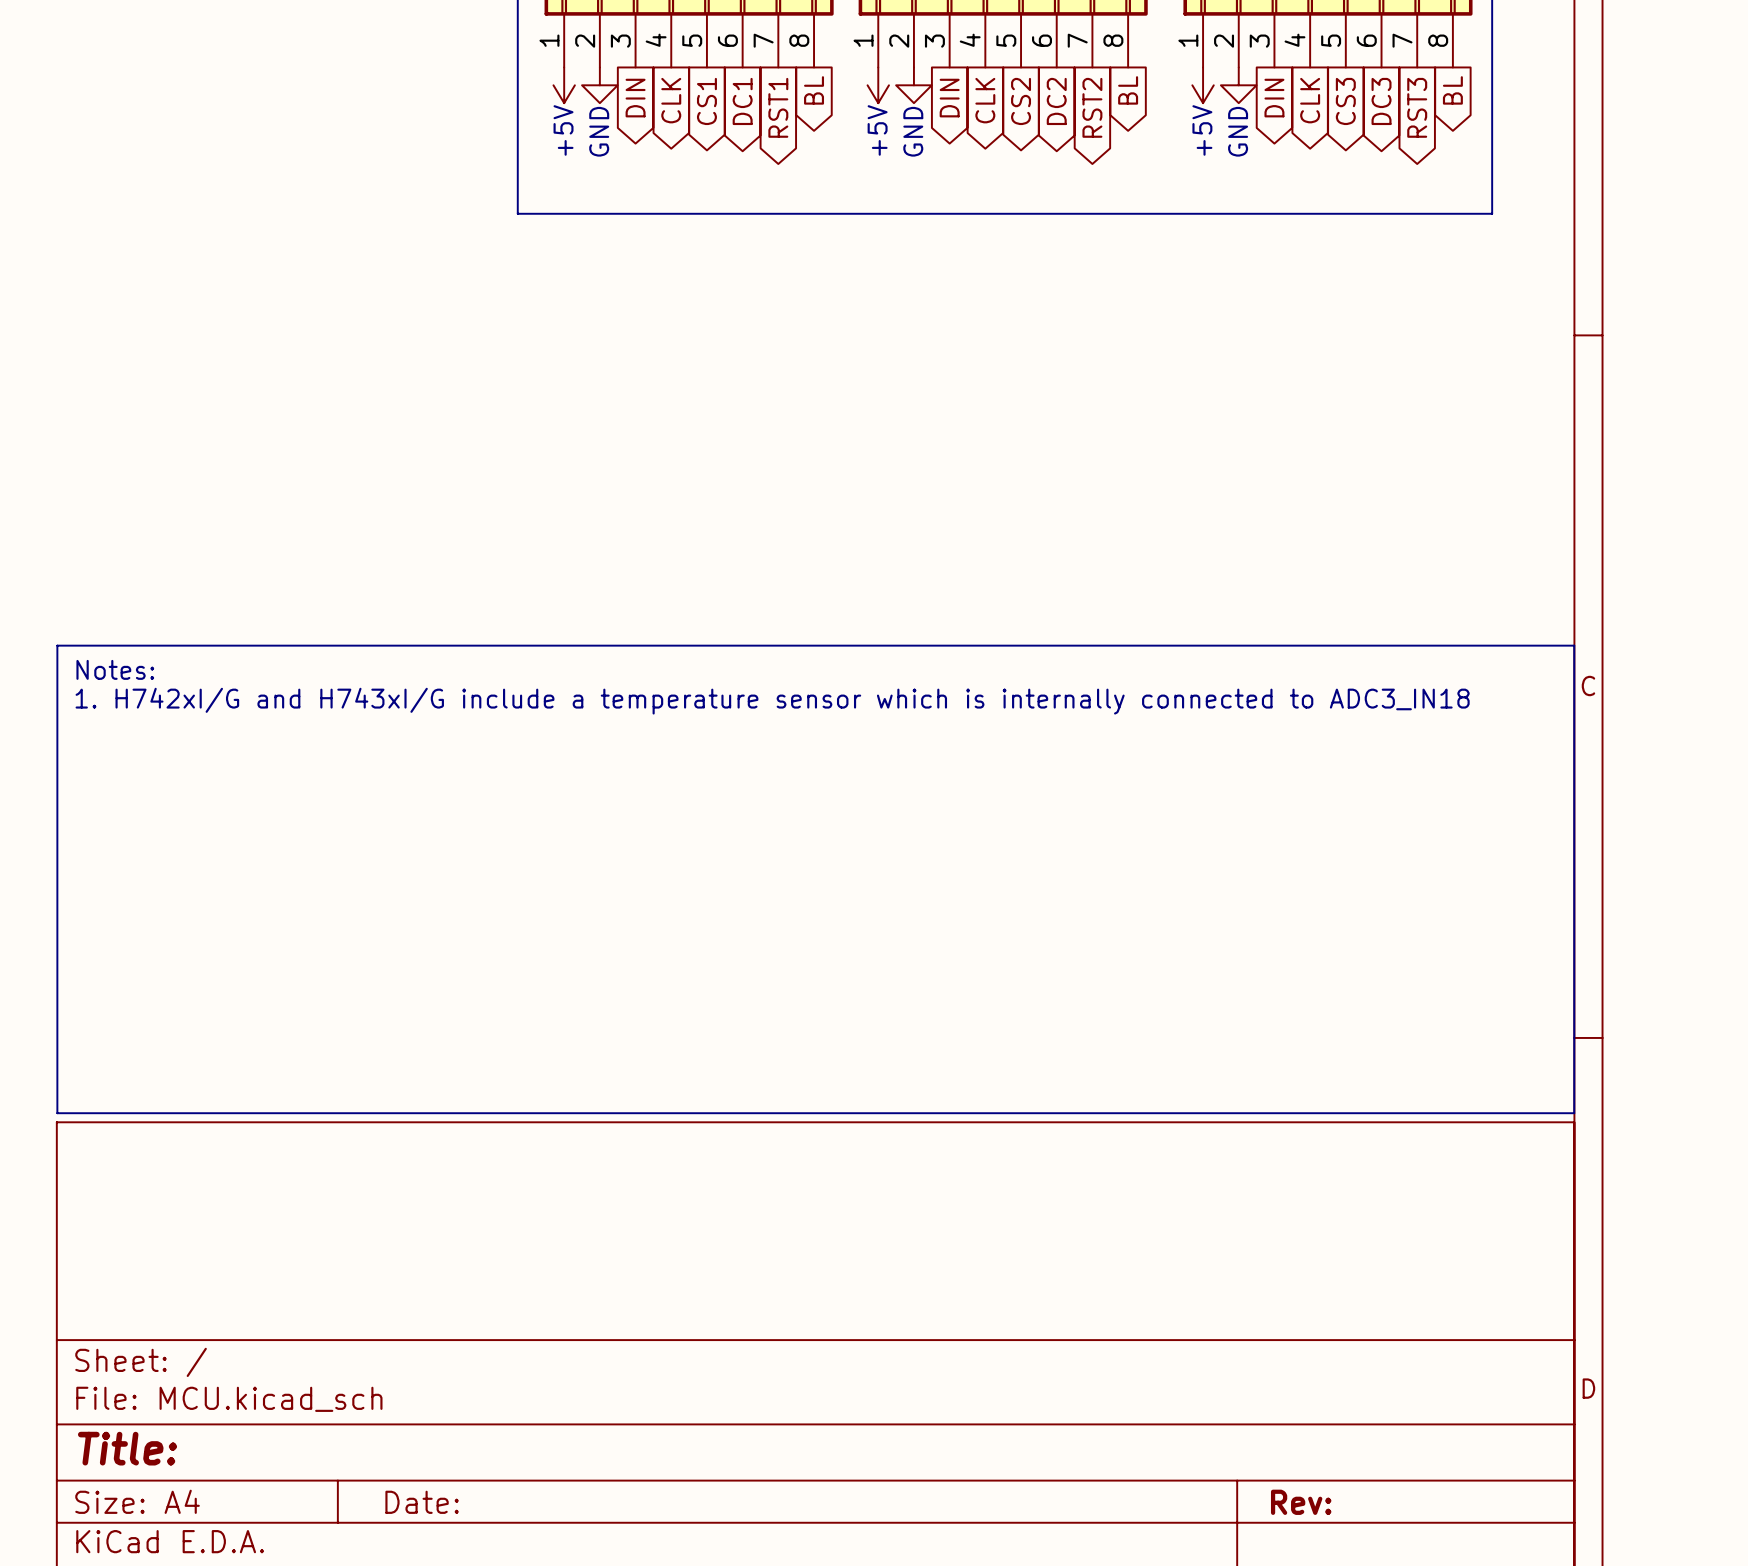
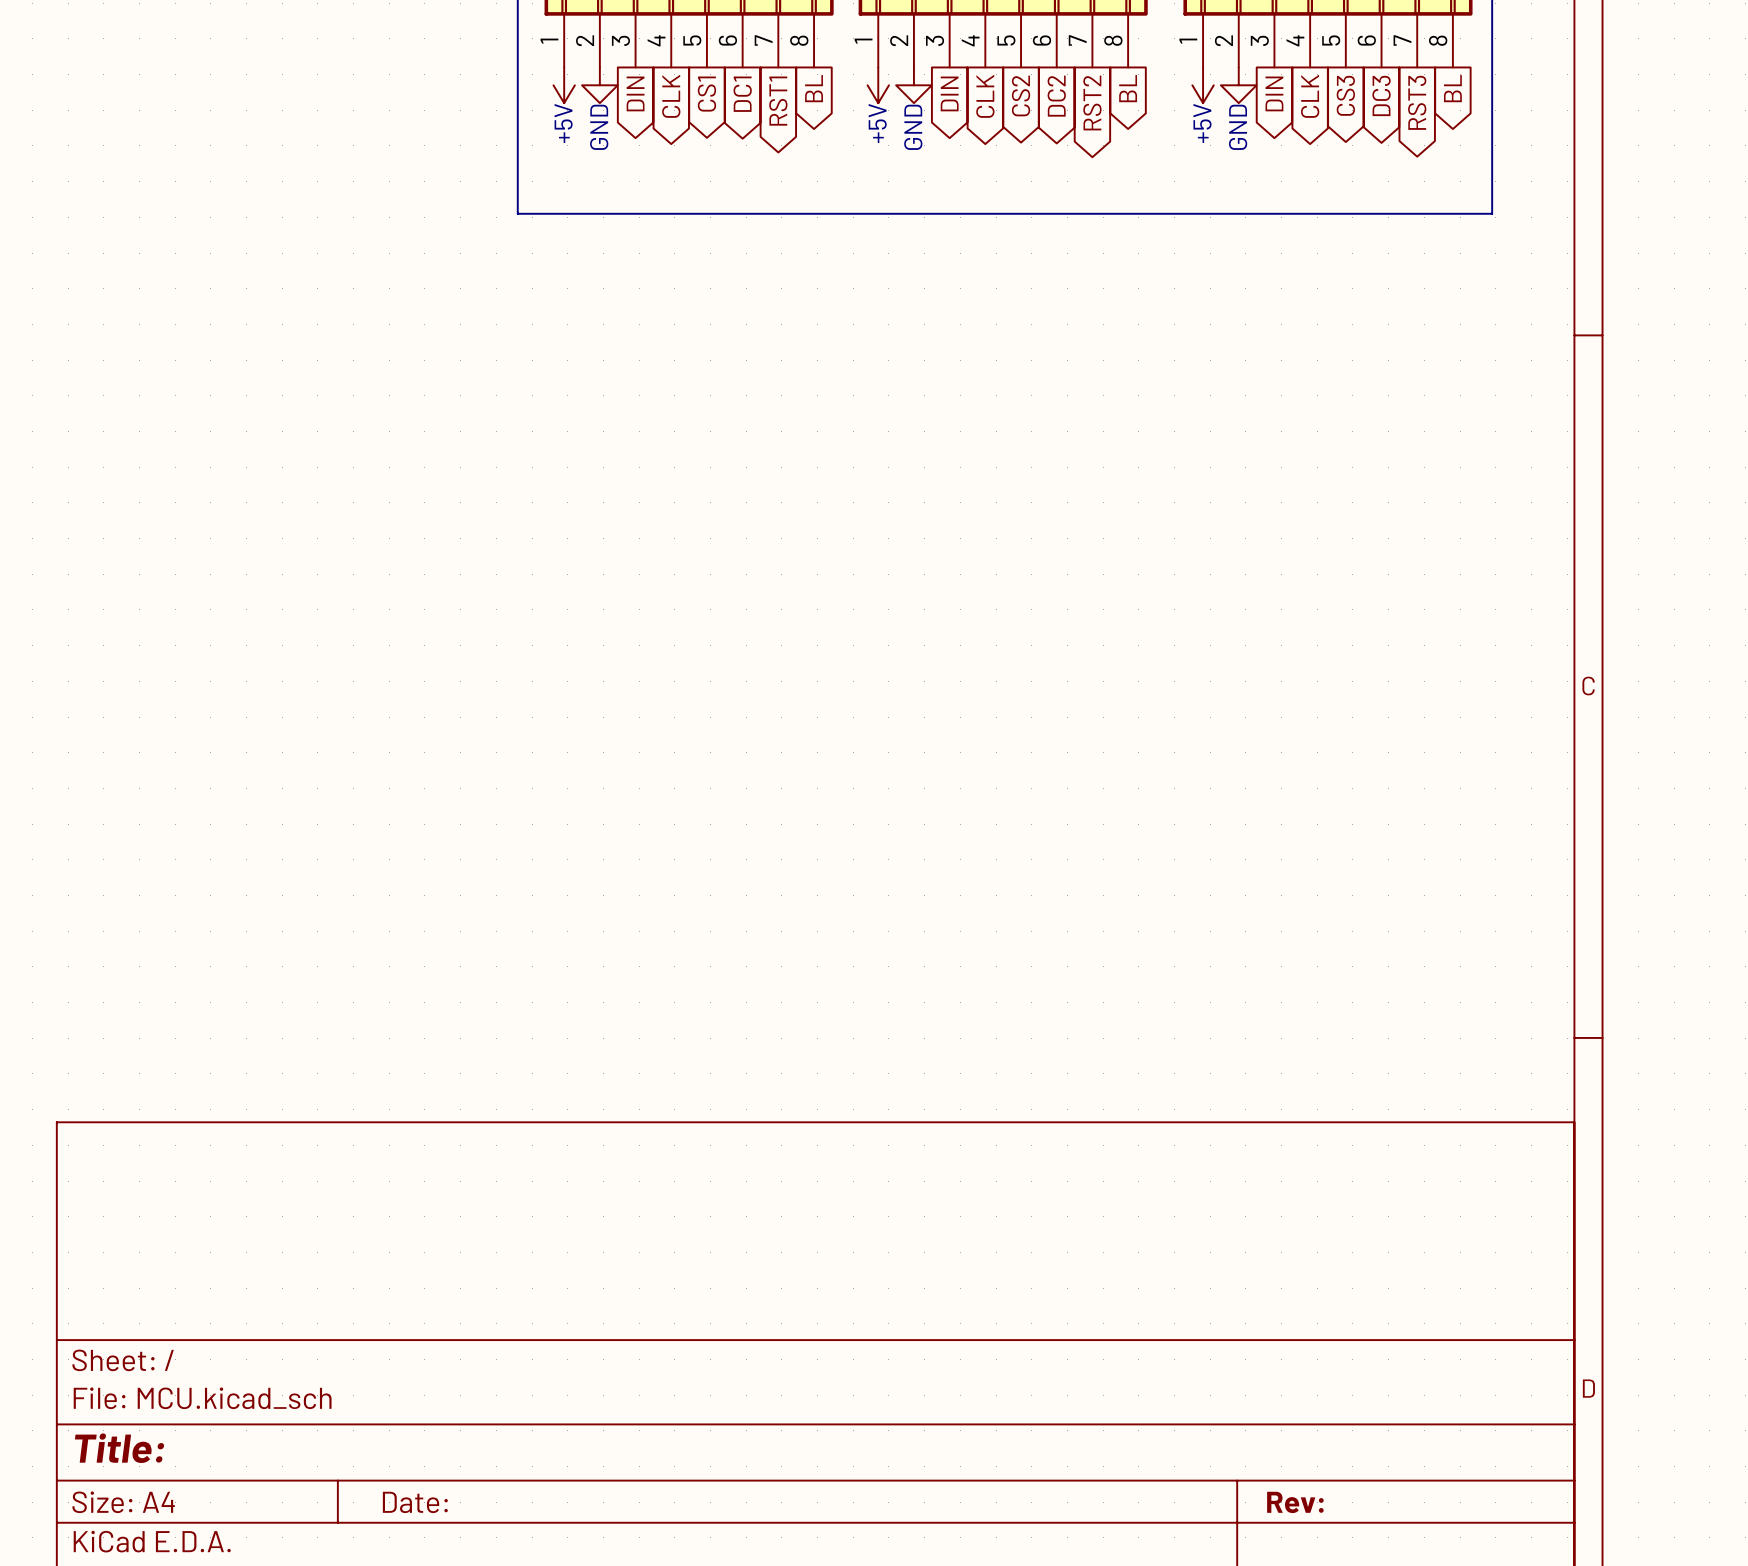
line: (57, 645) (1574, 645) (1574, 1113) (57, 1113) (57, 645) -> none
text: Notes: (115, 669) -> none
text: 1. H742xI/G and H743xI/G include a temperature sensor which is internally connected to ADC3_IN18 (772, 701) -> none

